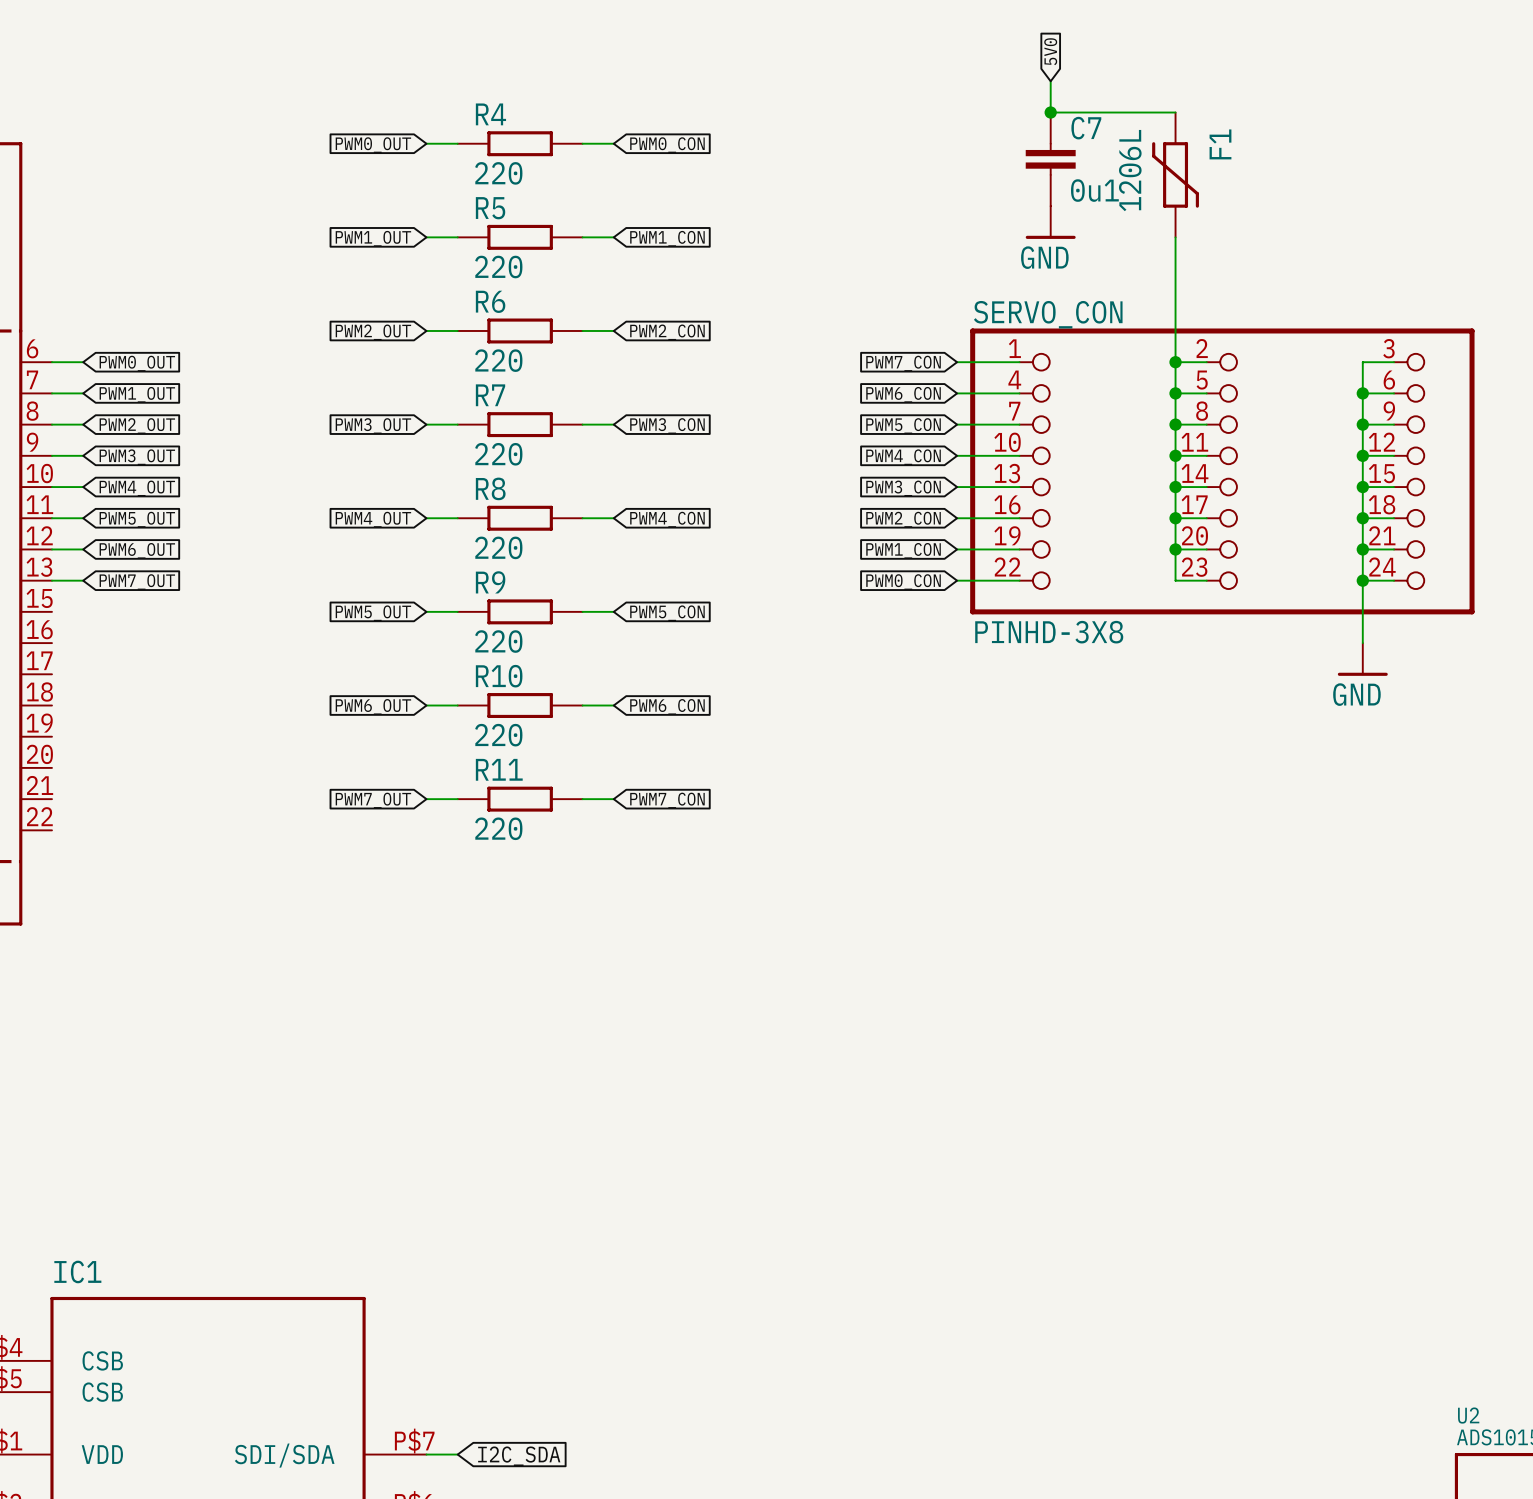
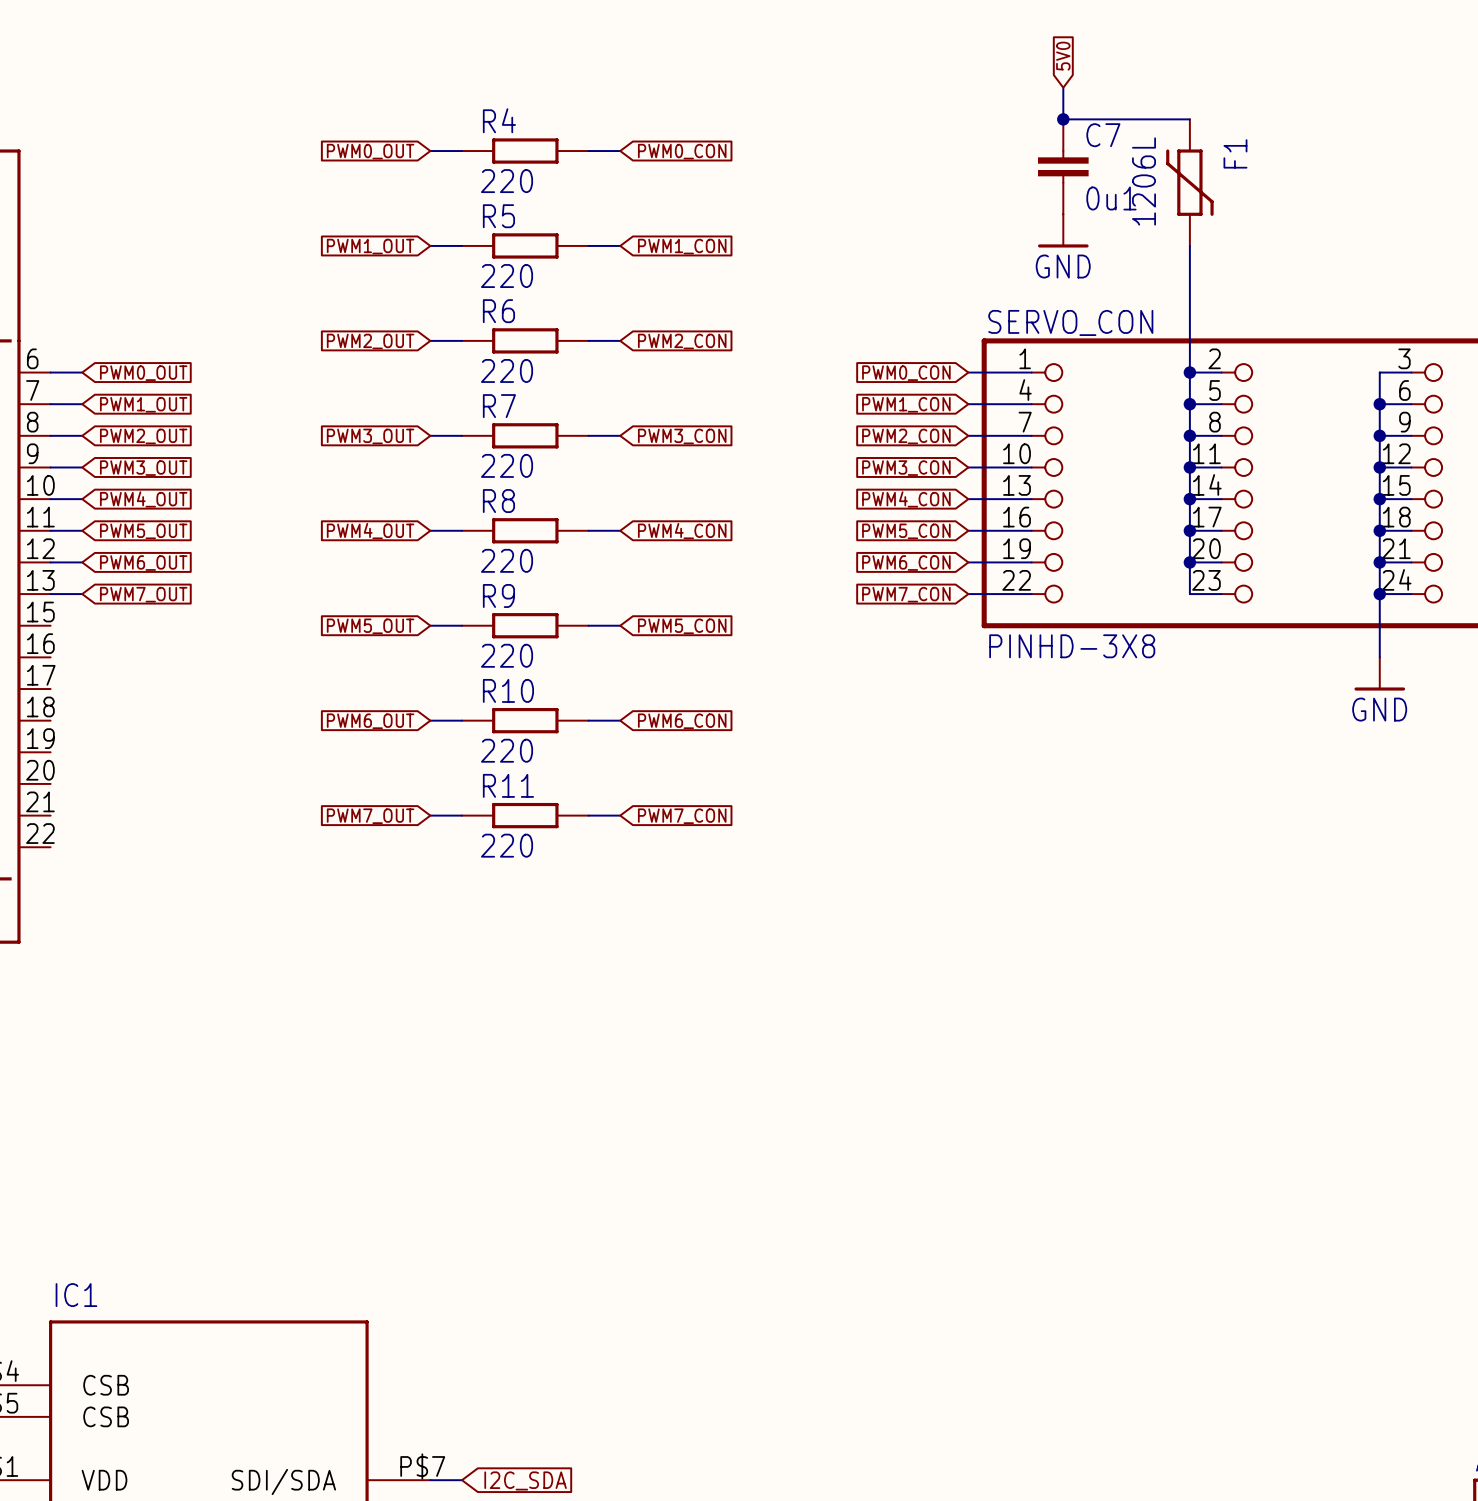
global label: PWM7_CON (903, 363) -> PWM0_CON (906, 373)
global label: PWM6_CON (903, 394) -> PWM1_CON (906, 404)
global label: PWM5_CON (903, 426) -> PWM2_CON (906, 436)
global label: PWM4_CON (903, 457) -> PWM3_CON (906, 468)
global label: PWM3_CON (903, 488) -> PWM4_CON (906, 499)
global label: PWM2_CON (903, 519) -> PWM5_CON (906, 531)
global label: PWM1_CON (903, 550) -> PWM6_CON (906, 563)
global label: PWM0_CON (903, 582) -> PWM7_CON (906, 594)

